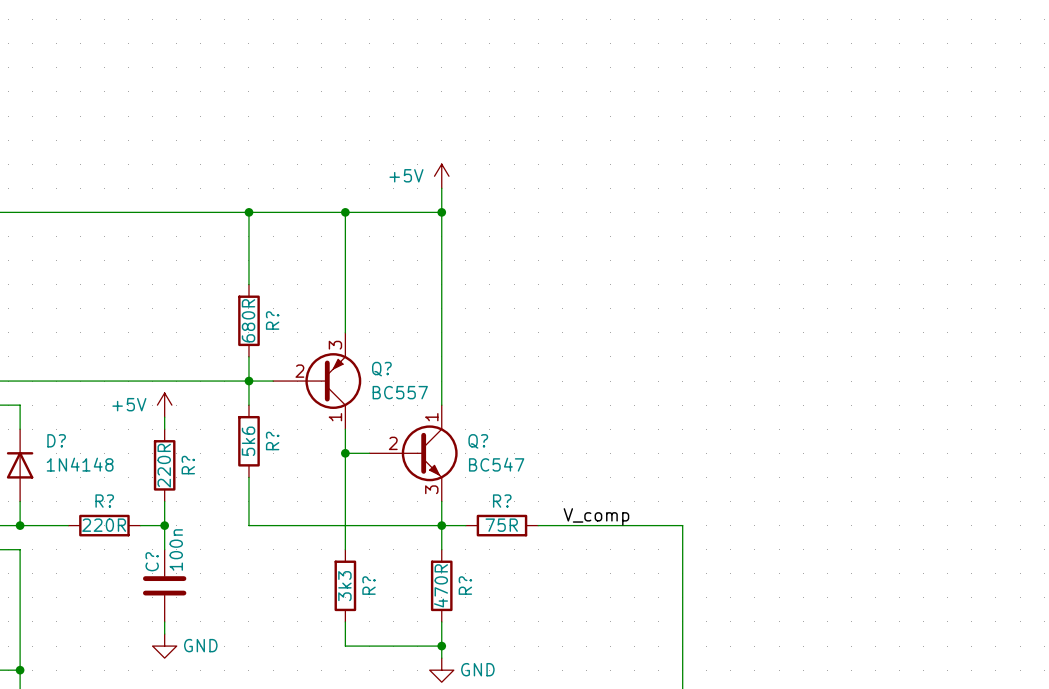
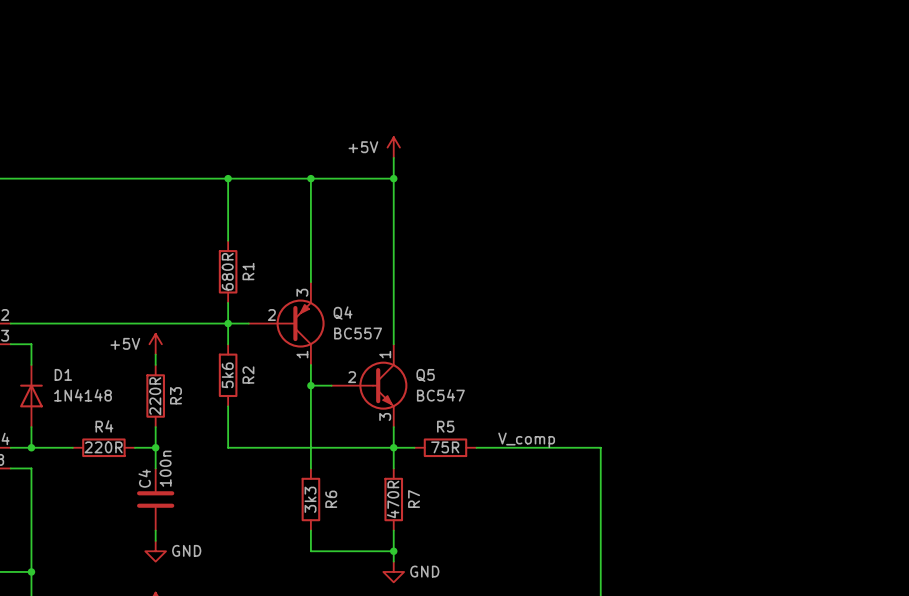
R? name: R? (272, 320) -> R1 (248, 271)
Q? name: Q? (381, 369) -> Q4 (343, 313)
D? name: D? (56, 440) -> D1 (63, 374)
R? name: R? (272, 440) -> R2 (248, 375)
Q? name: Q? (478, 441) -> Q5 (425, 375)
R? name: R? (188, 465) -> R3 (175, 395)
R? name: R? (104, 501) -> R4 (104, 426)
R? name: R? (502, 501) -> R5 (445, 426)
C? name: C? (152, 561) -> C4 (144, 478)
R? name: R? (369, 585) -> R6 (331, 499)
R? name: R? (465, 585) -> R7 (414, 499)

